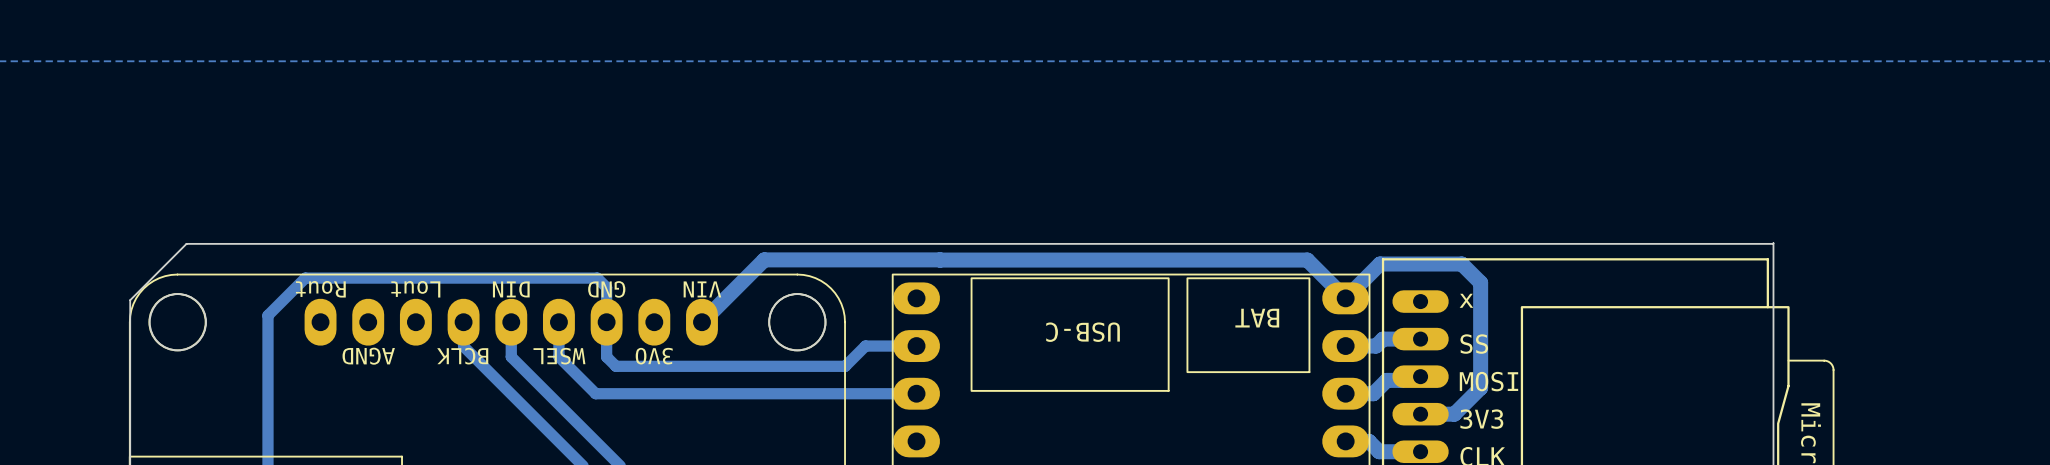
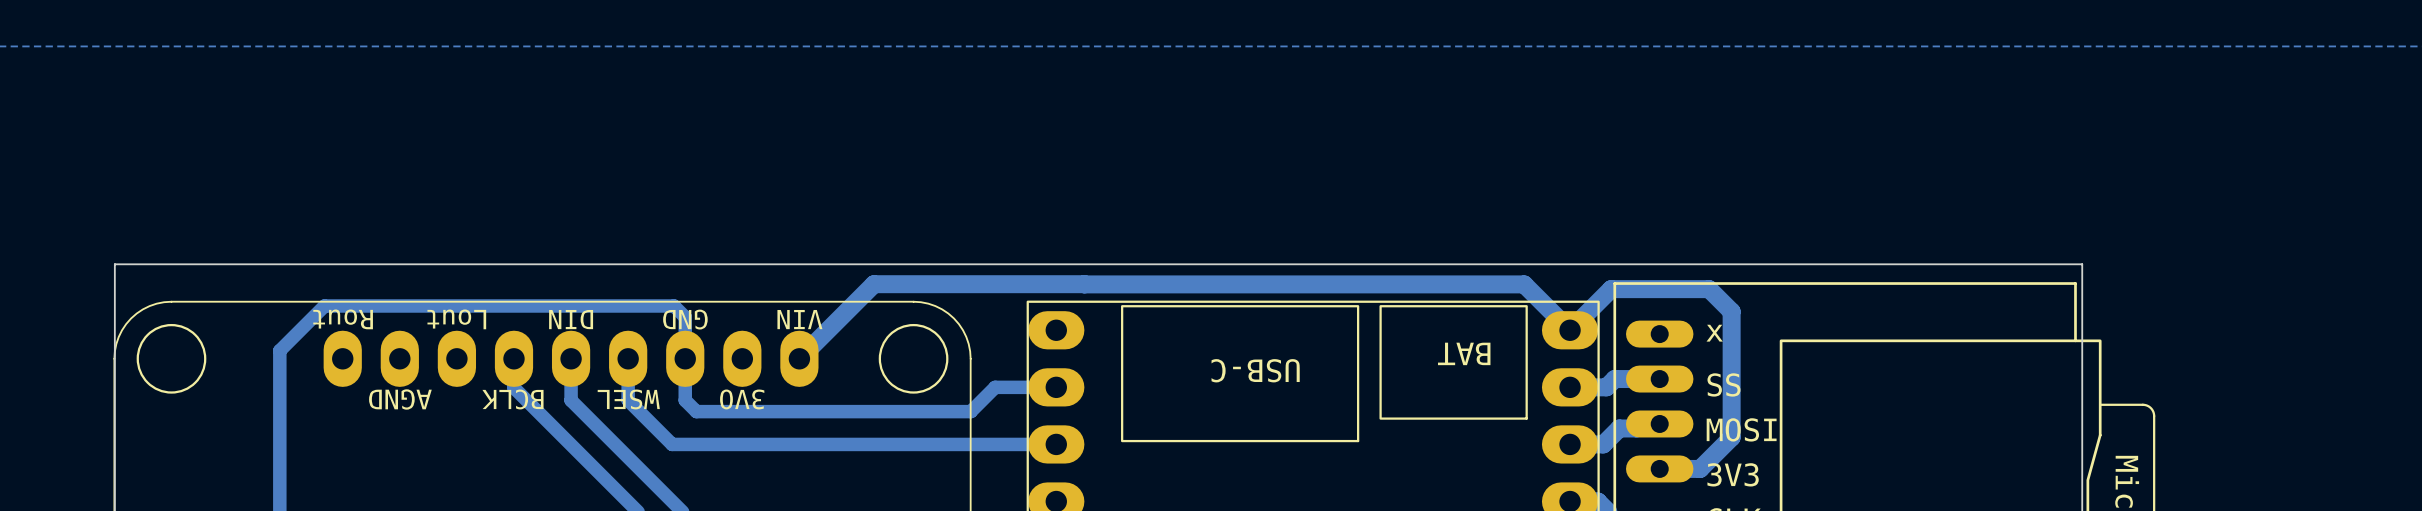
board edge: (1773, 243) (186, 243) (130, 300) -> (2082, 264) (114, 264) (114, 332)
round board edge: [149, 293, 207, 351] -> none
round board edge: [768, 293, 826, 351] -> none

